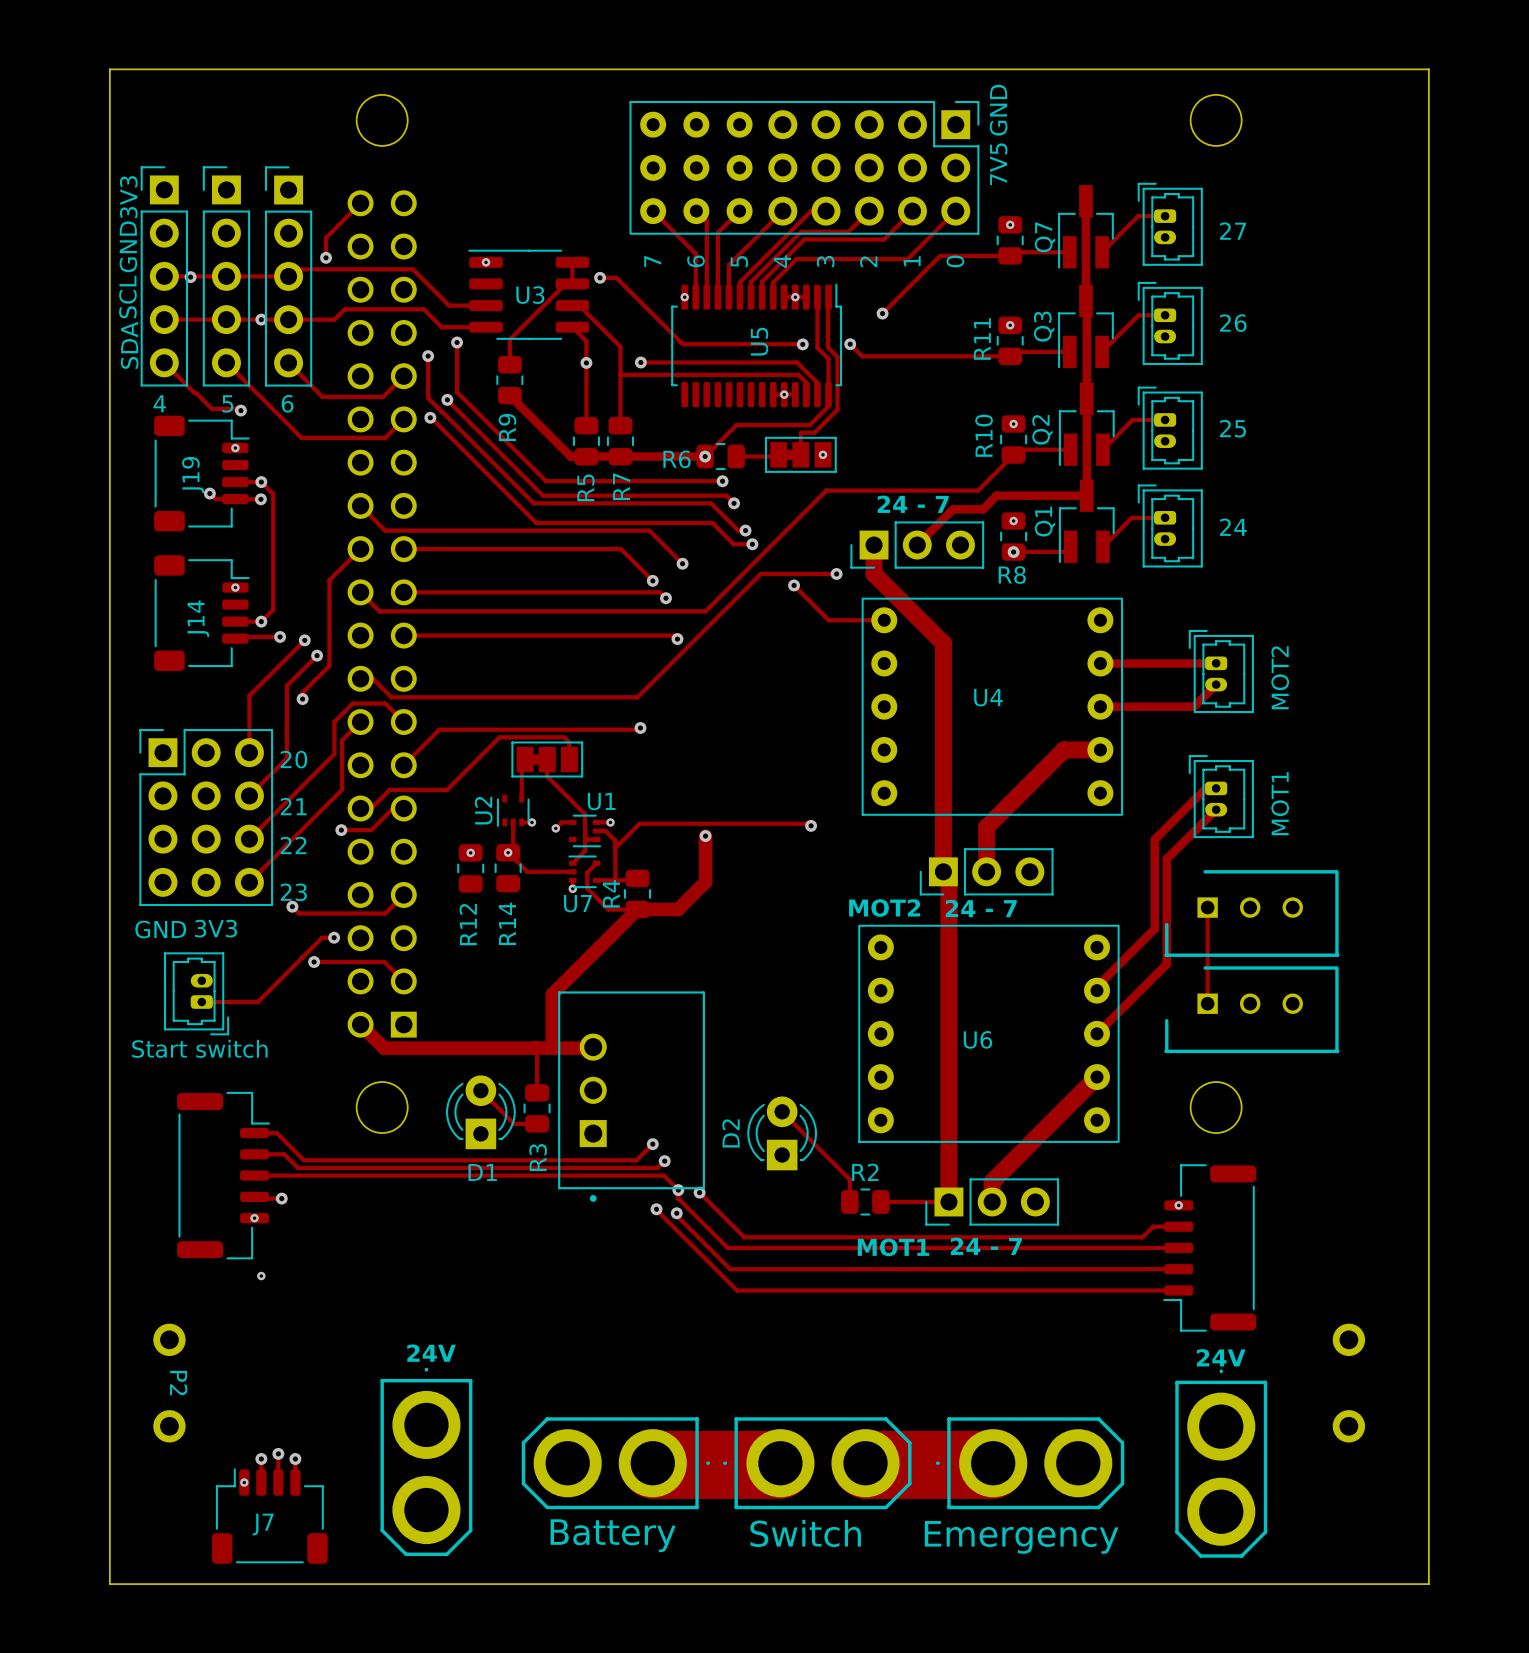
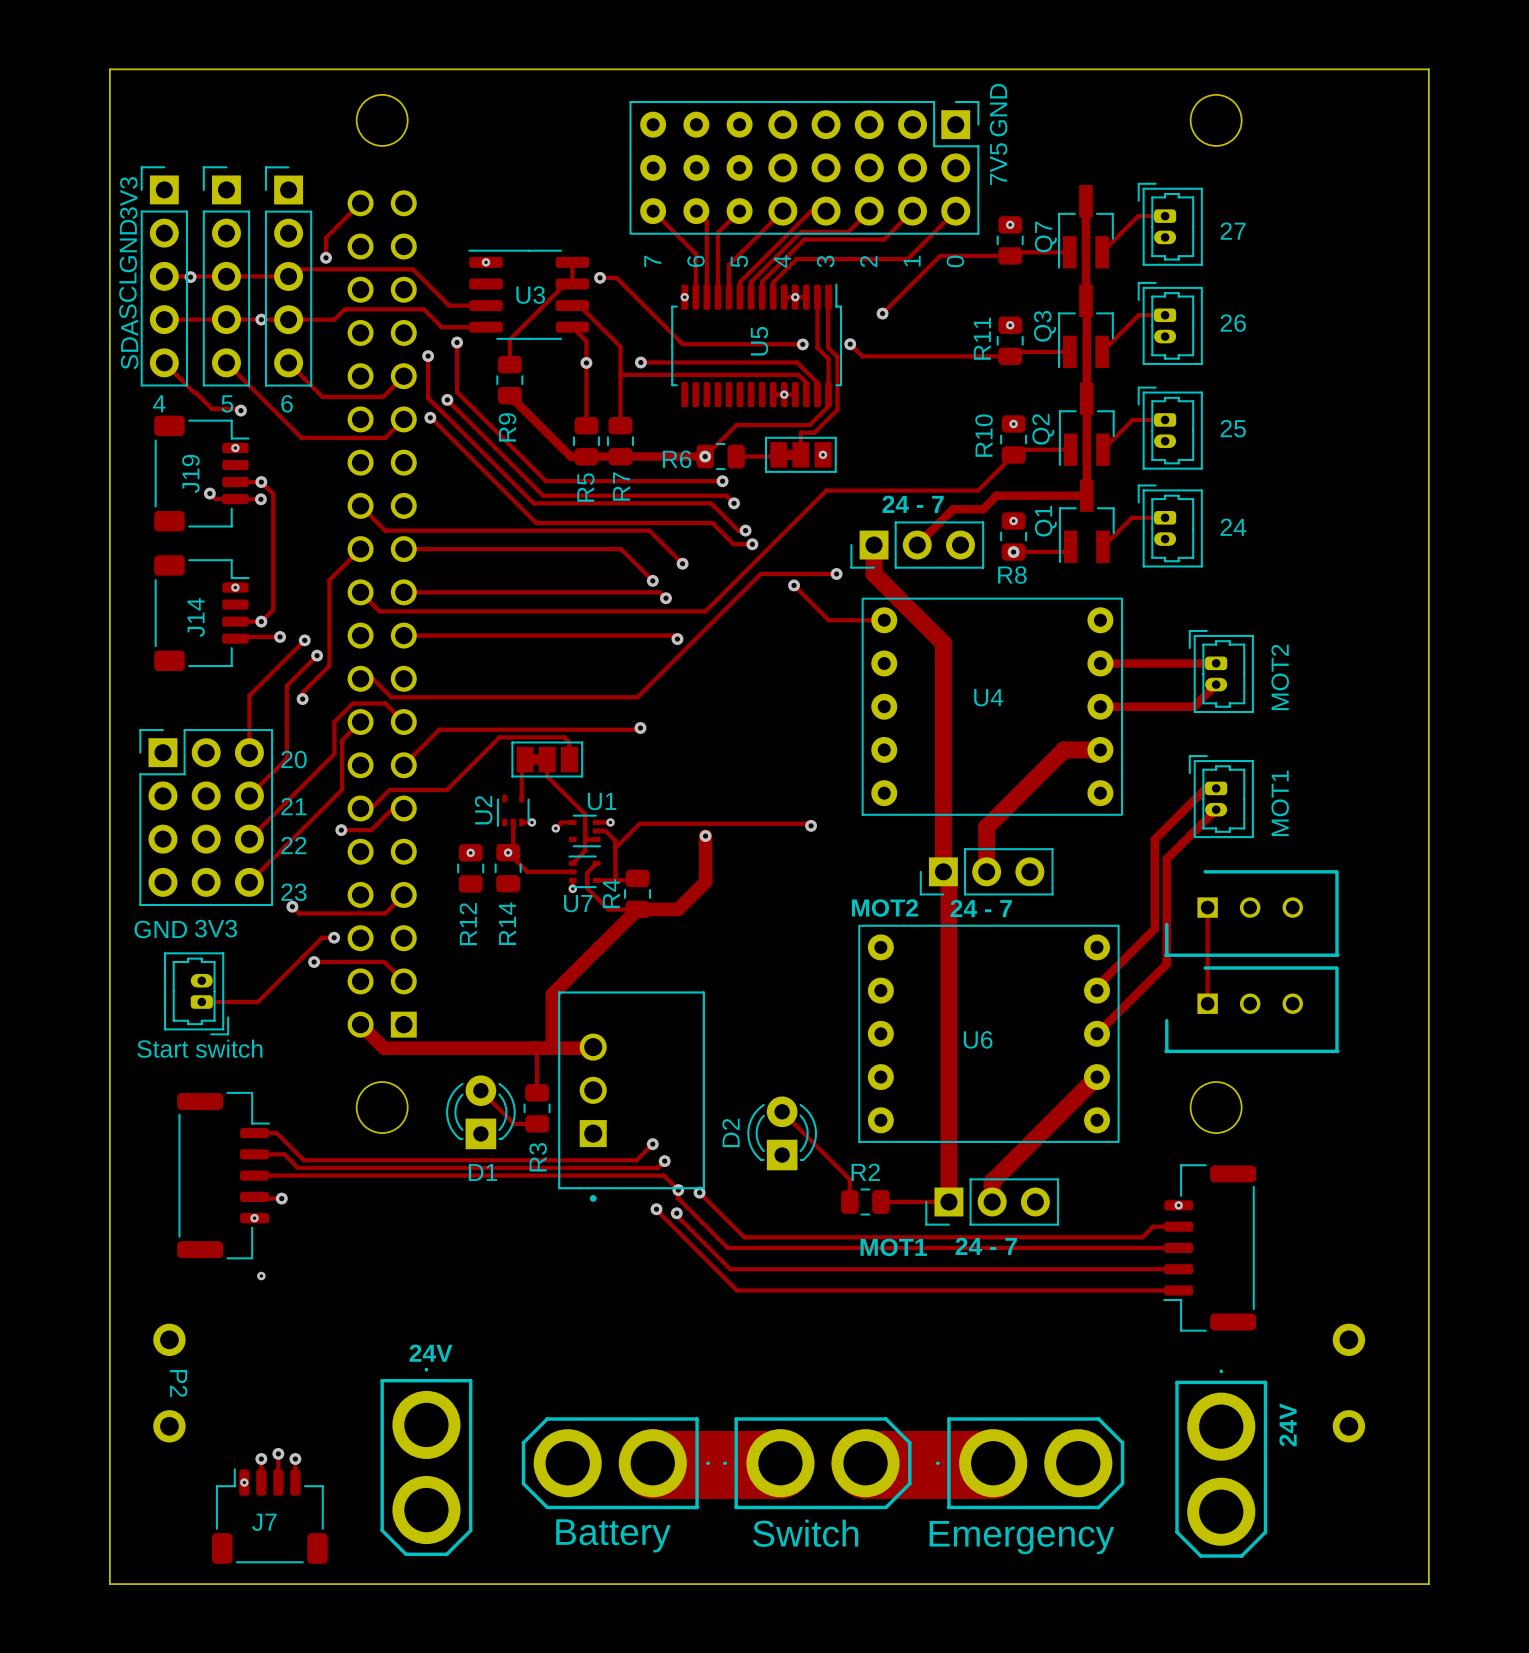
text rotation: 0° (1221, 1357) -> 90° counterclockwise (1288, 1424)
text position: 24V (1221, 1357) -> 24V (1288, 1424)

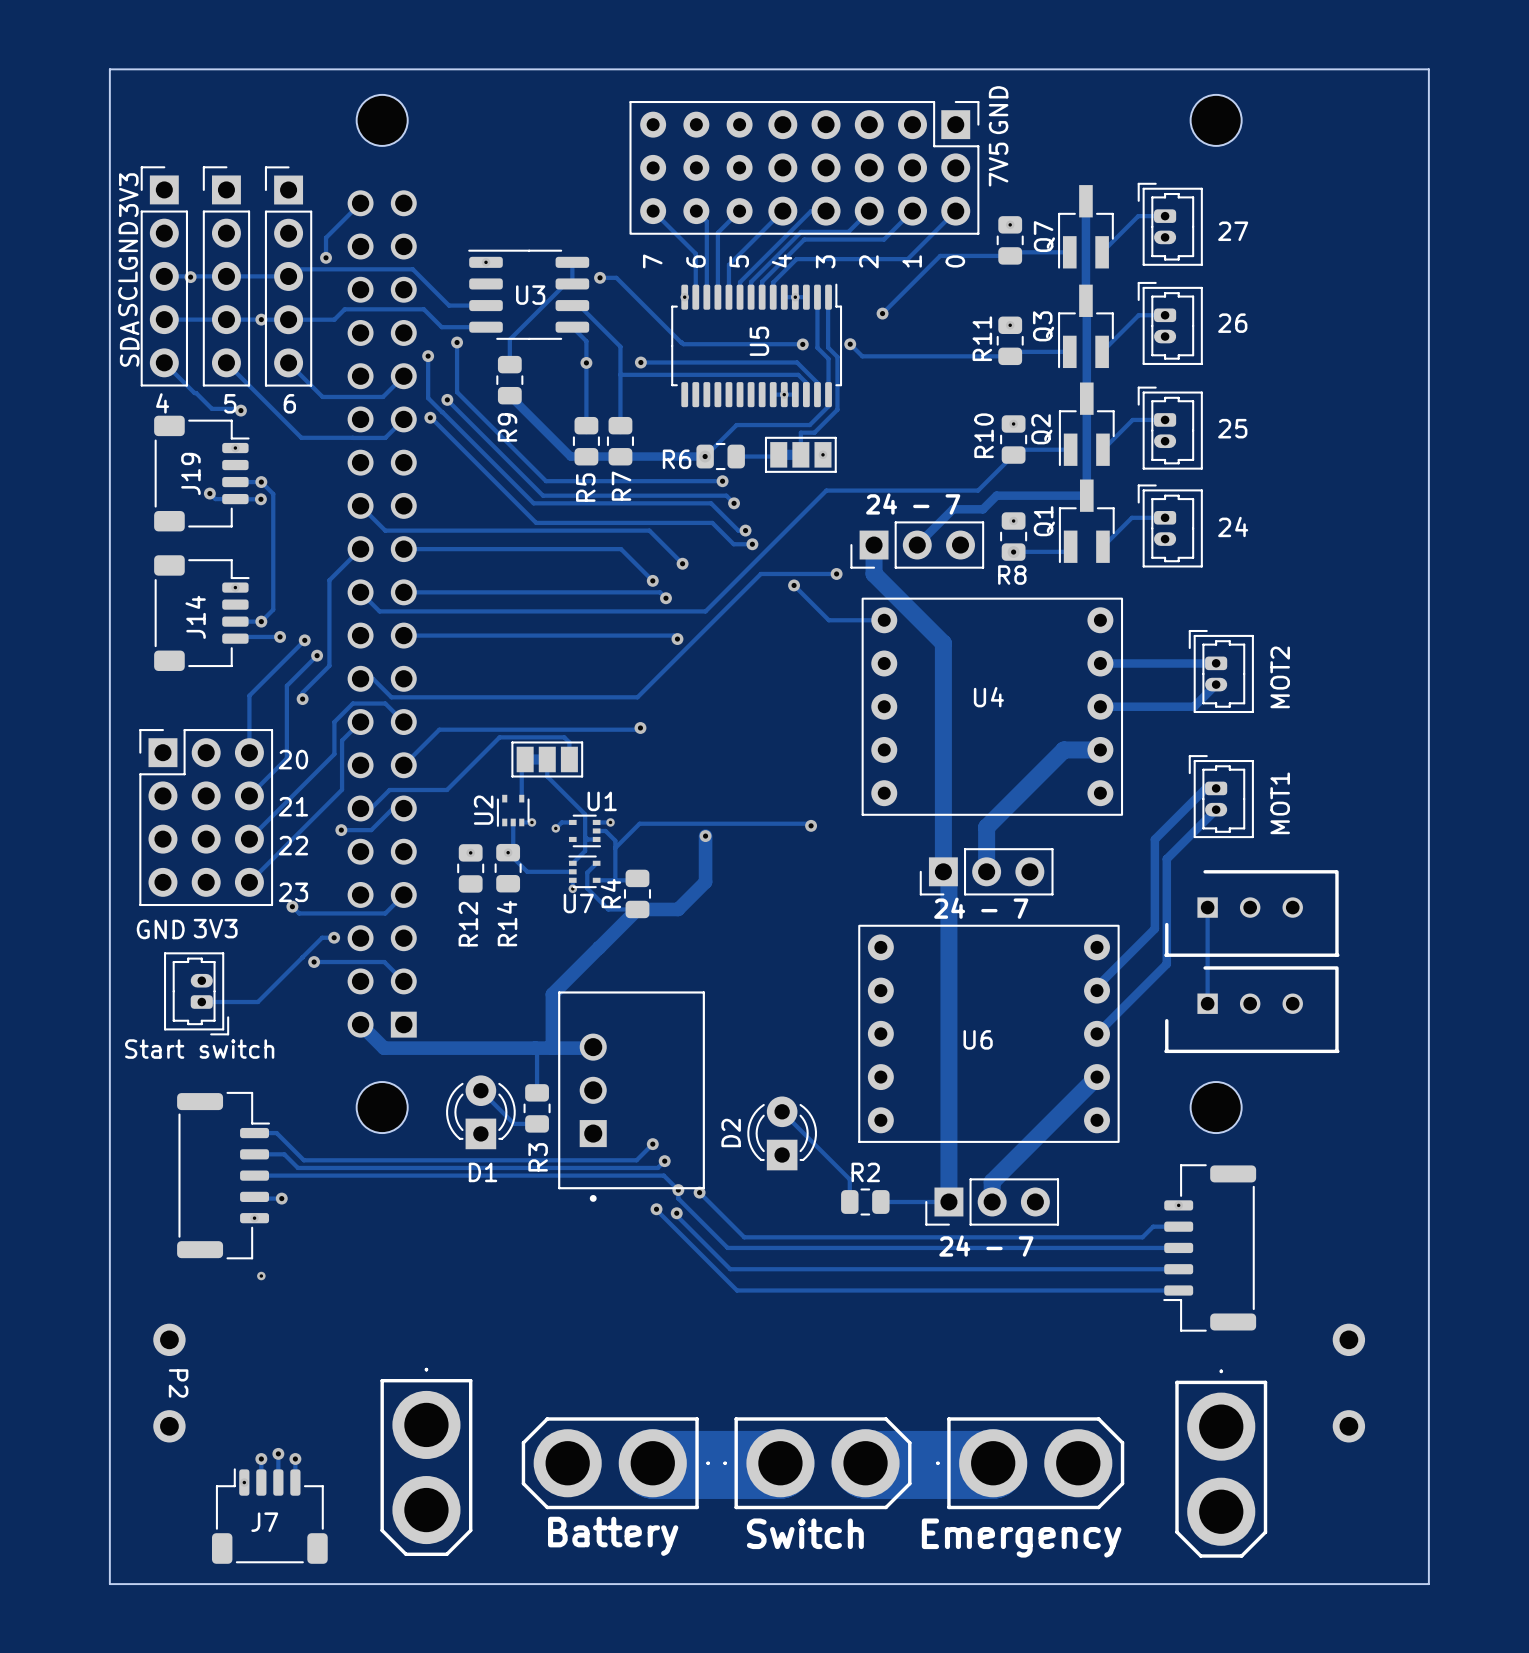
text: MOT2 (884, 908) -> none
text: MOT1 (893, 1247) -> none
text: 24V (431, 1353) -> none
text: 24V (1288, 1424) -> none

